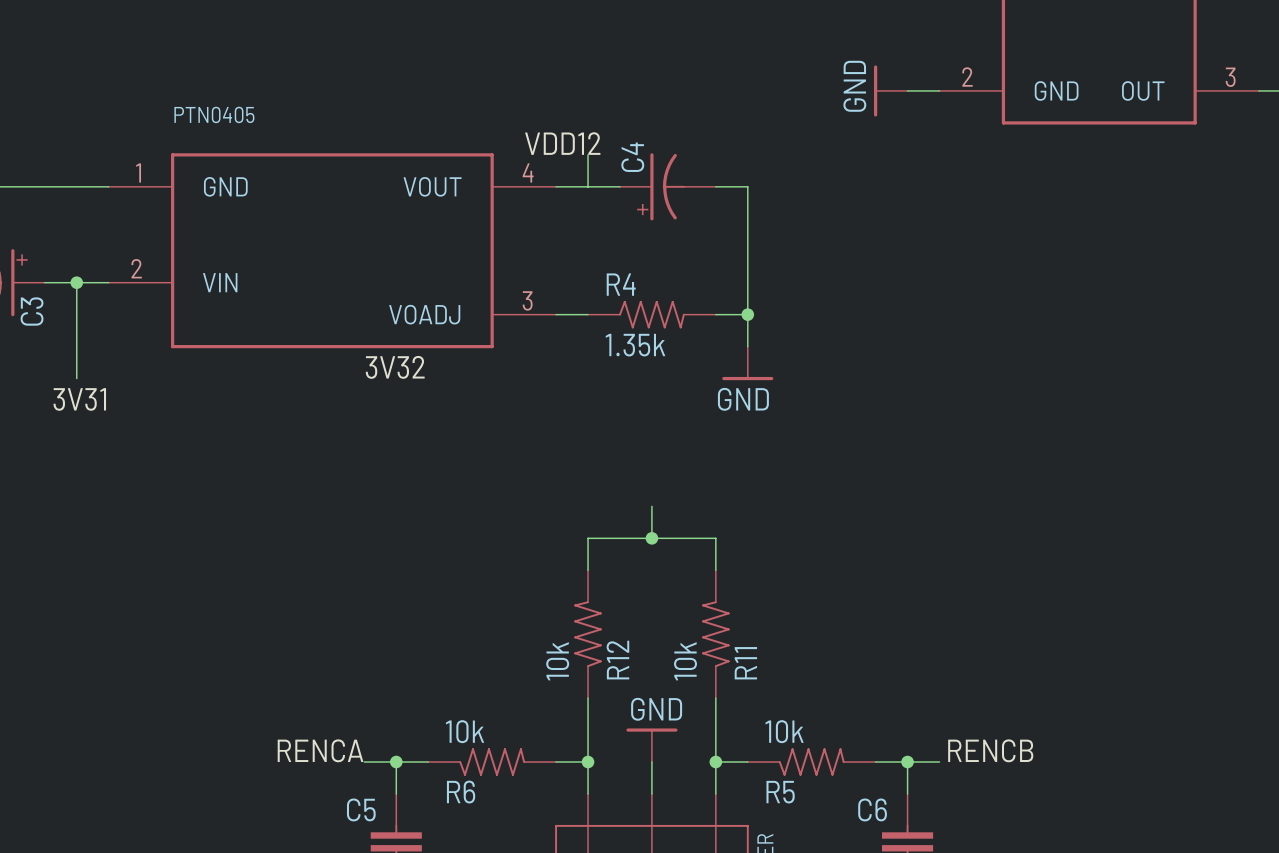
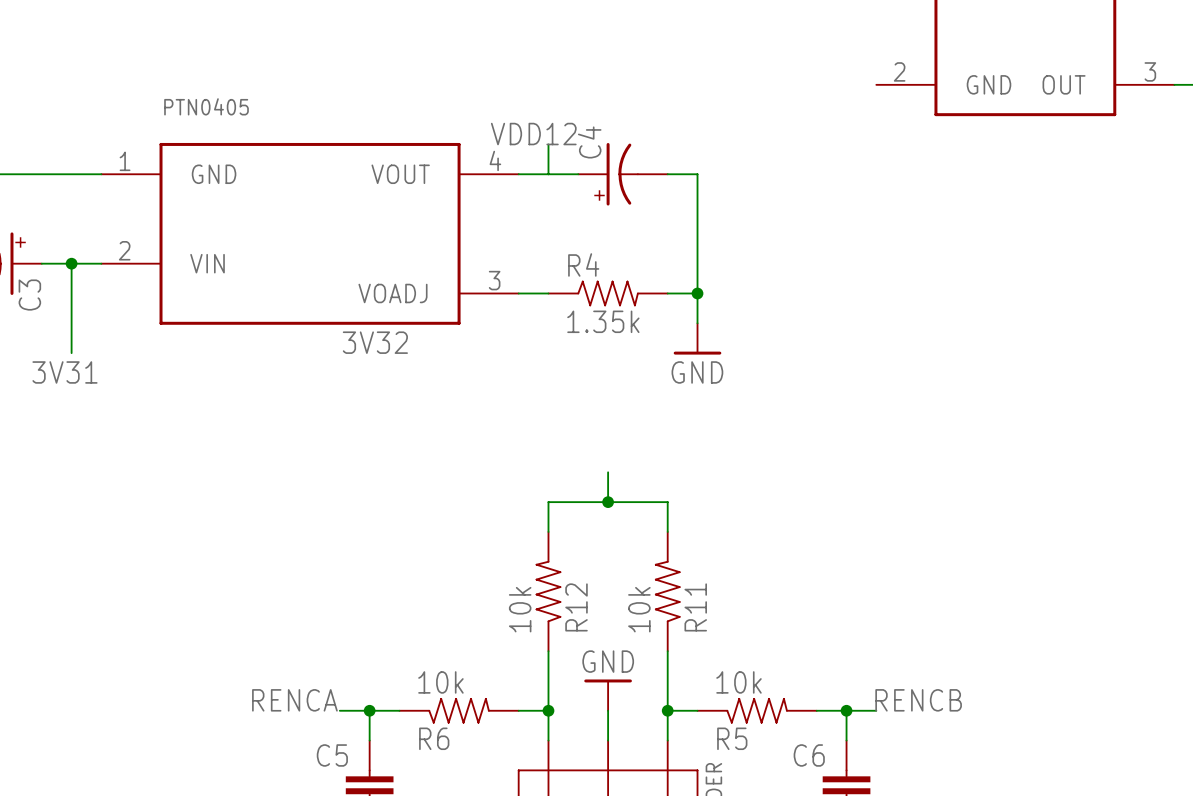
power symbol: GND (890, 90) -> none
wire: (907, 90) (939, 90) -> none

